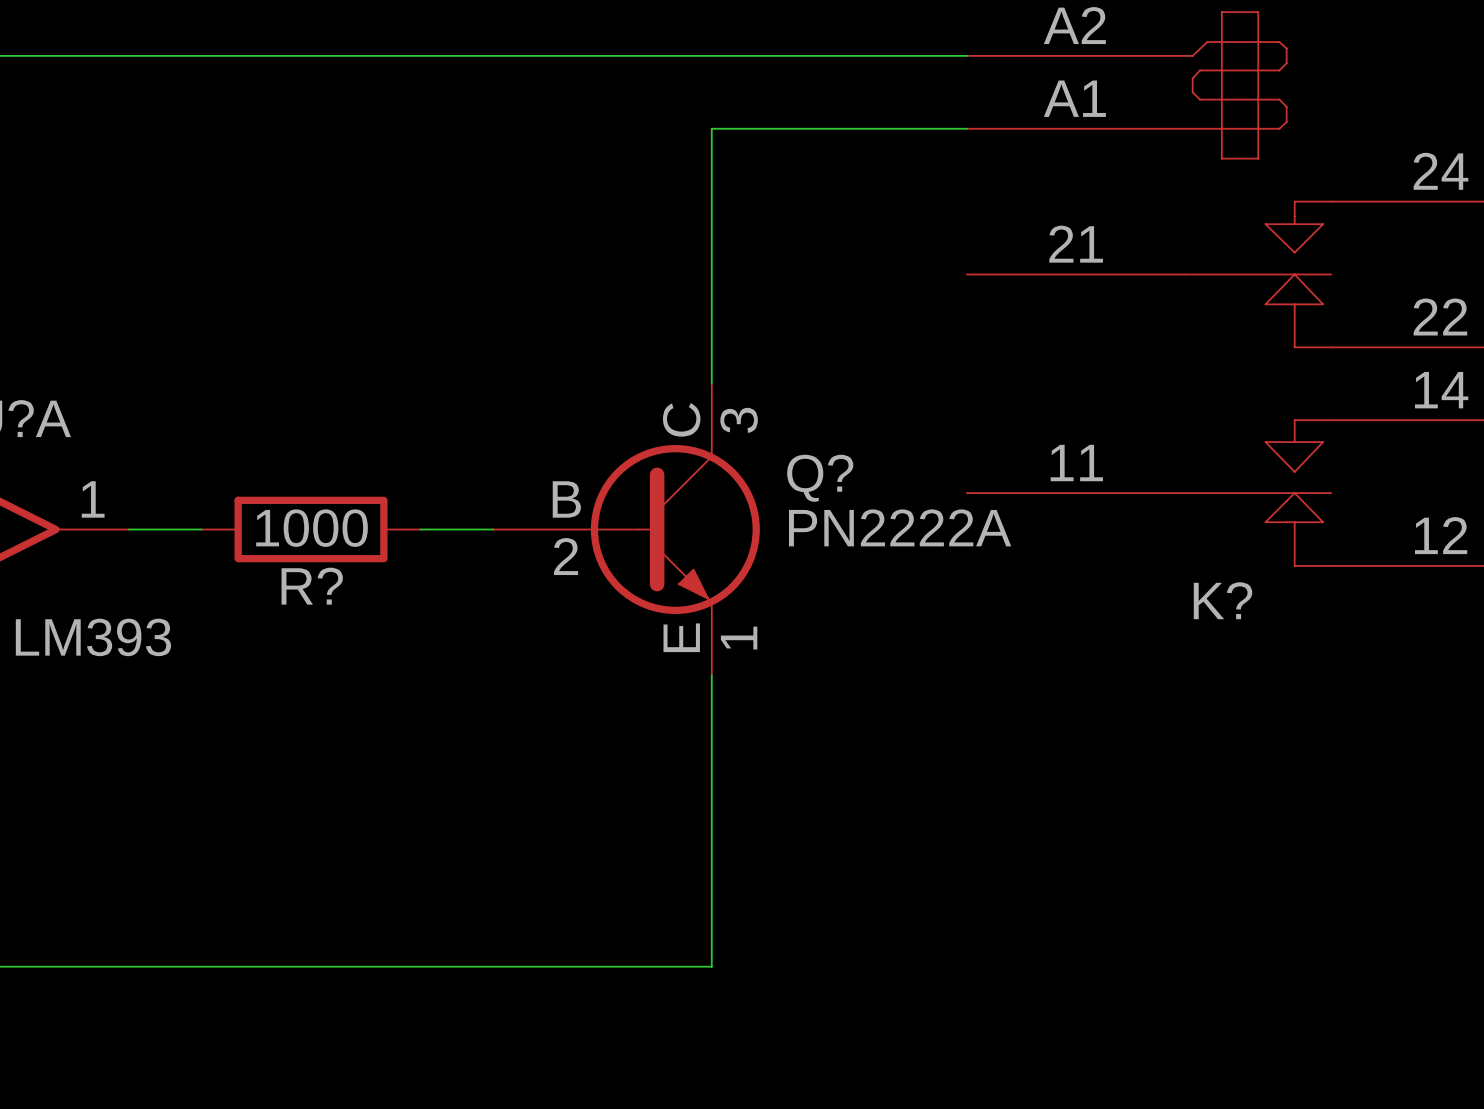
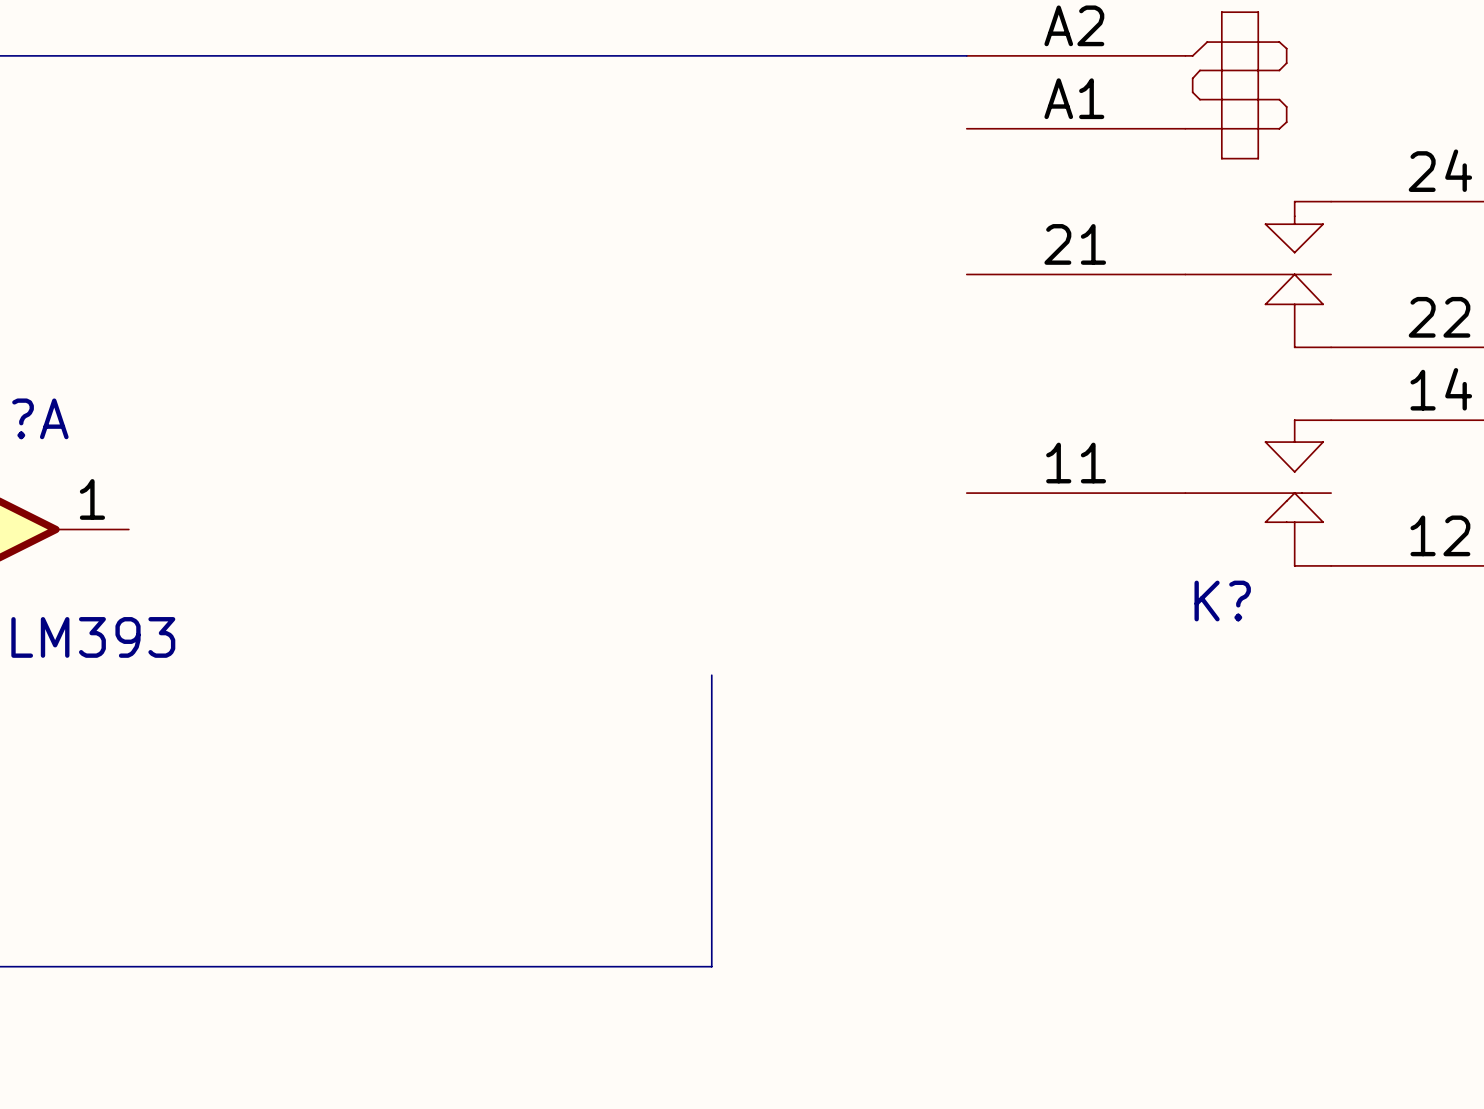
wire: (966, 128) (711, 128) (711, 383) -> none
wire: (128, 529) (201, 529) -> none
R?: 1000 (311, 529) -> none
wire: (420, 529) (493, 529) -> none
Q?: PN2222A (626, 529) -> none

